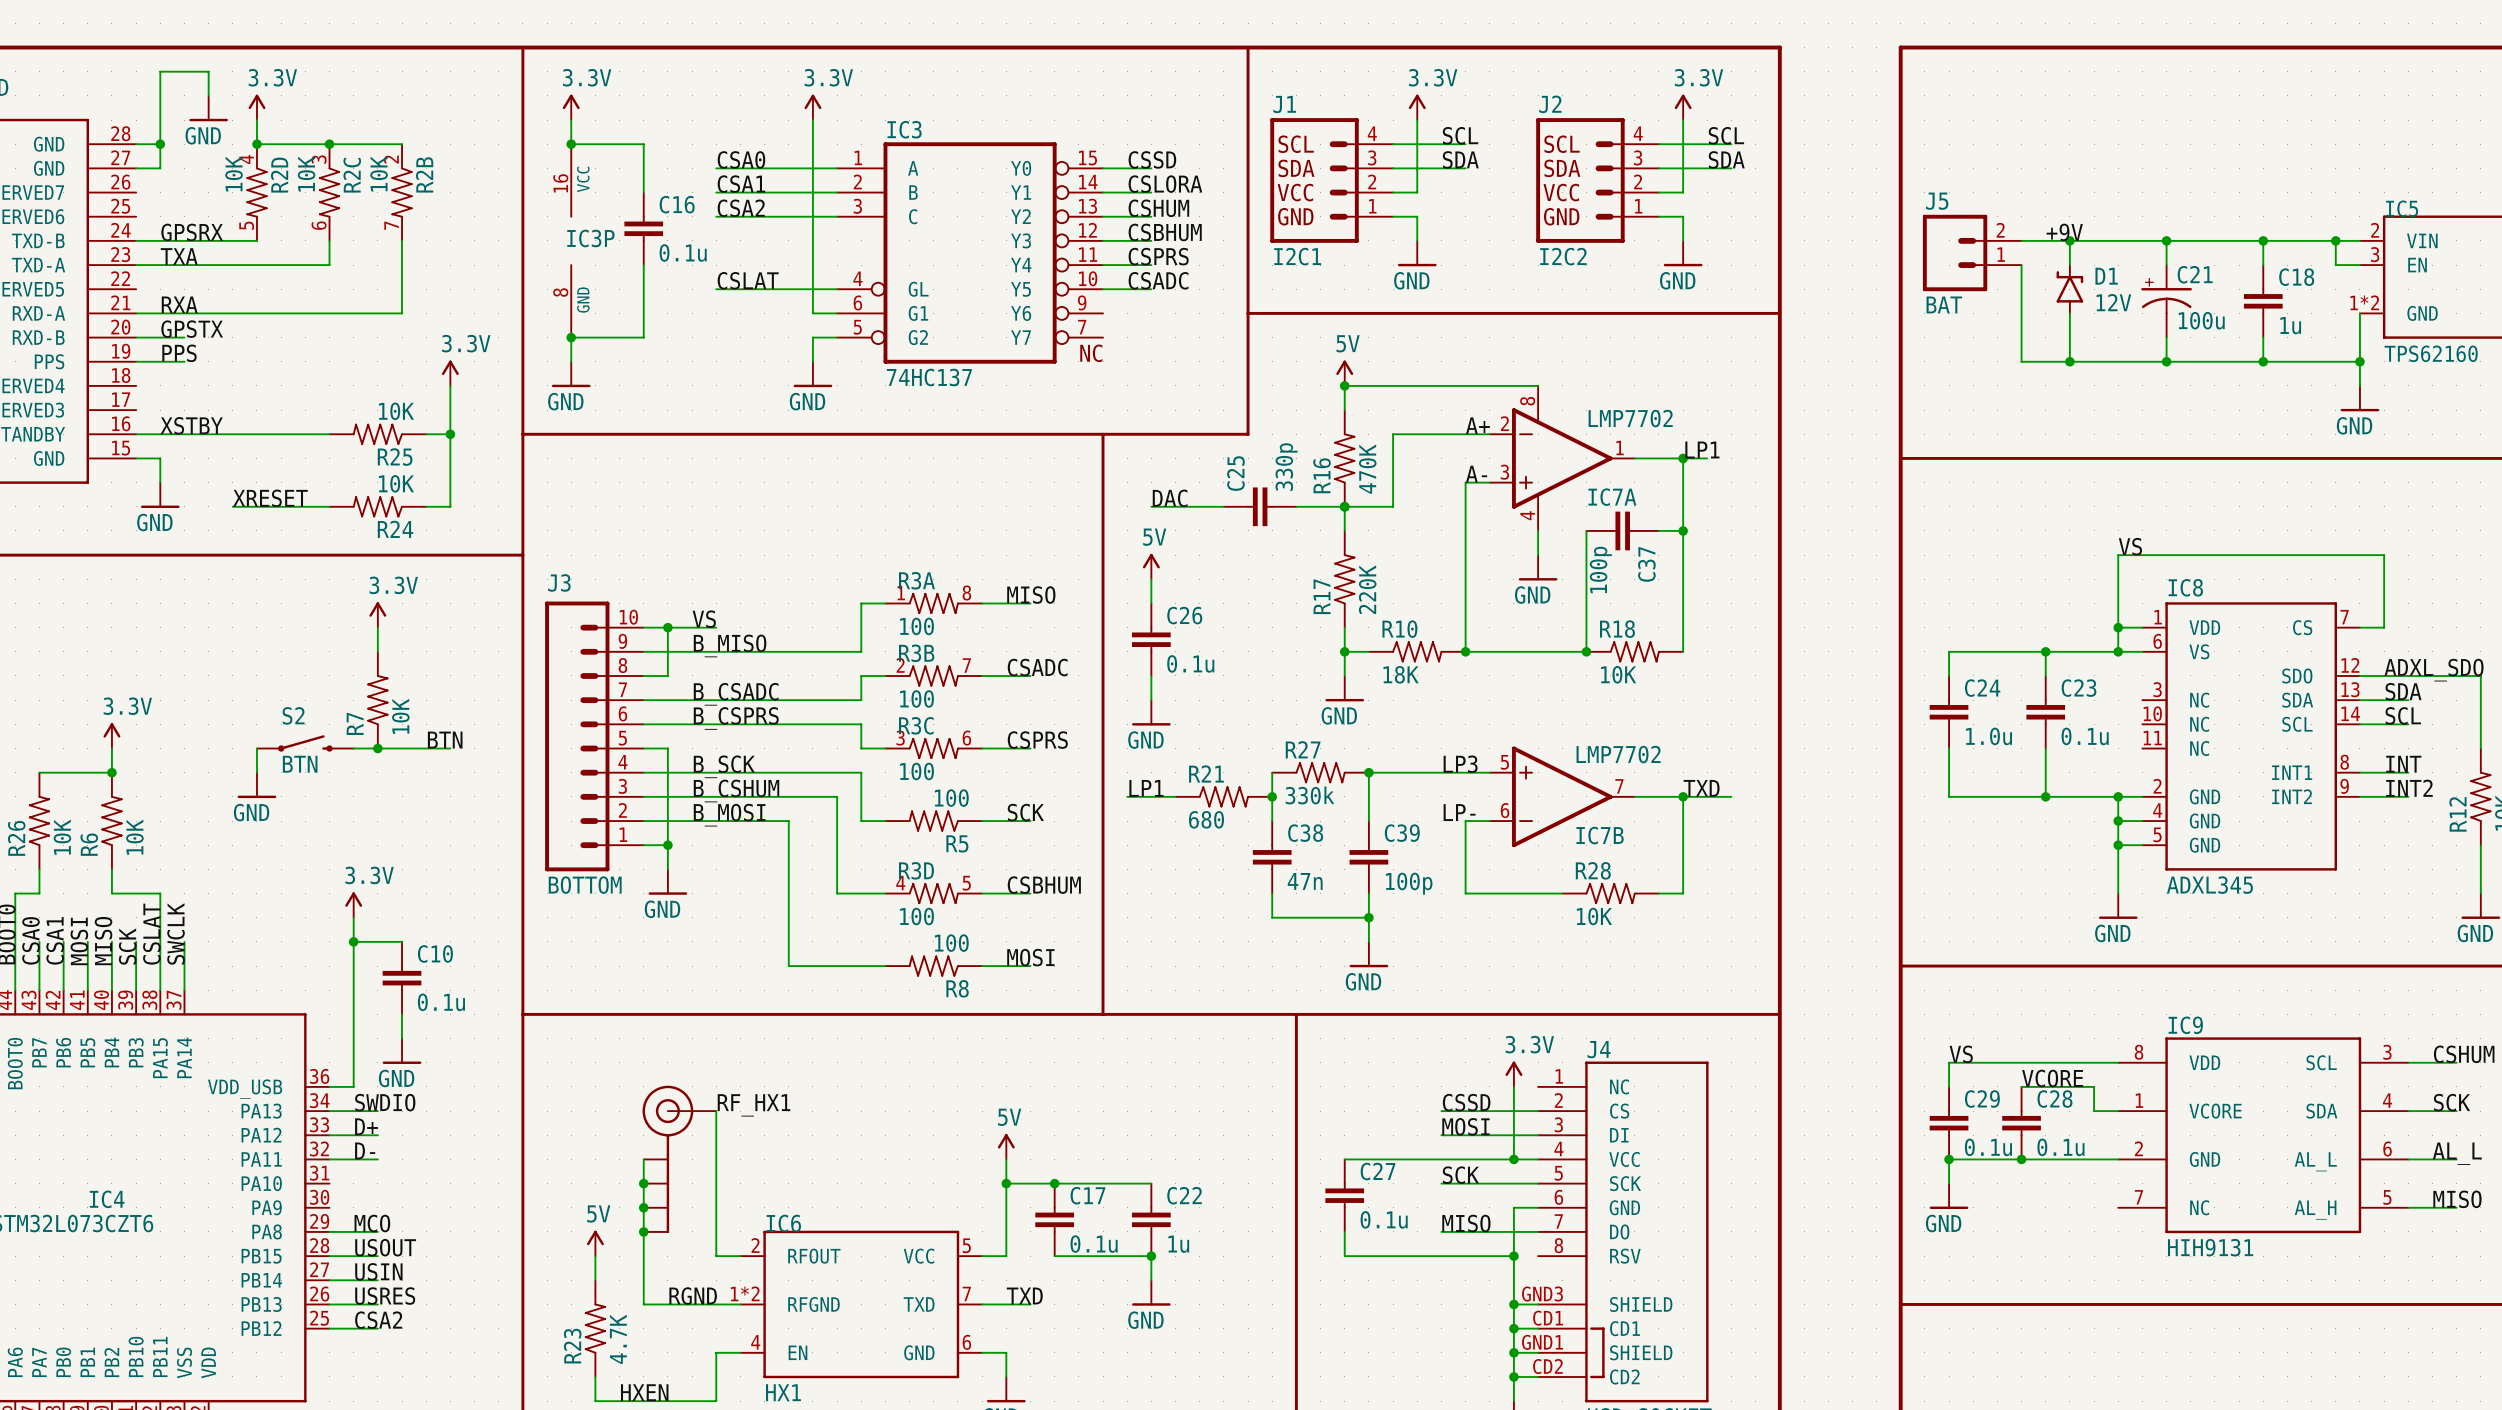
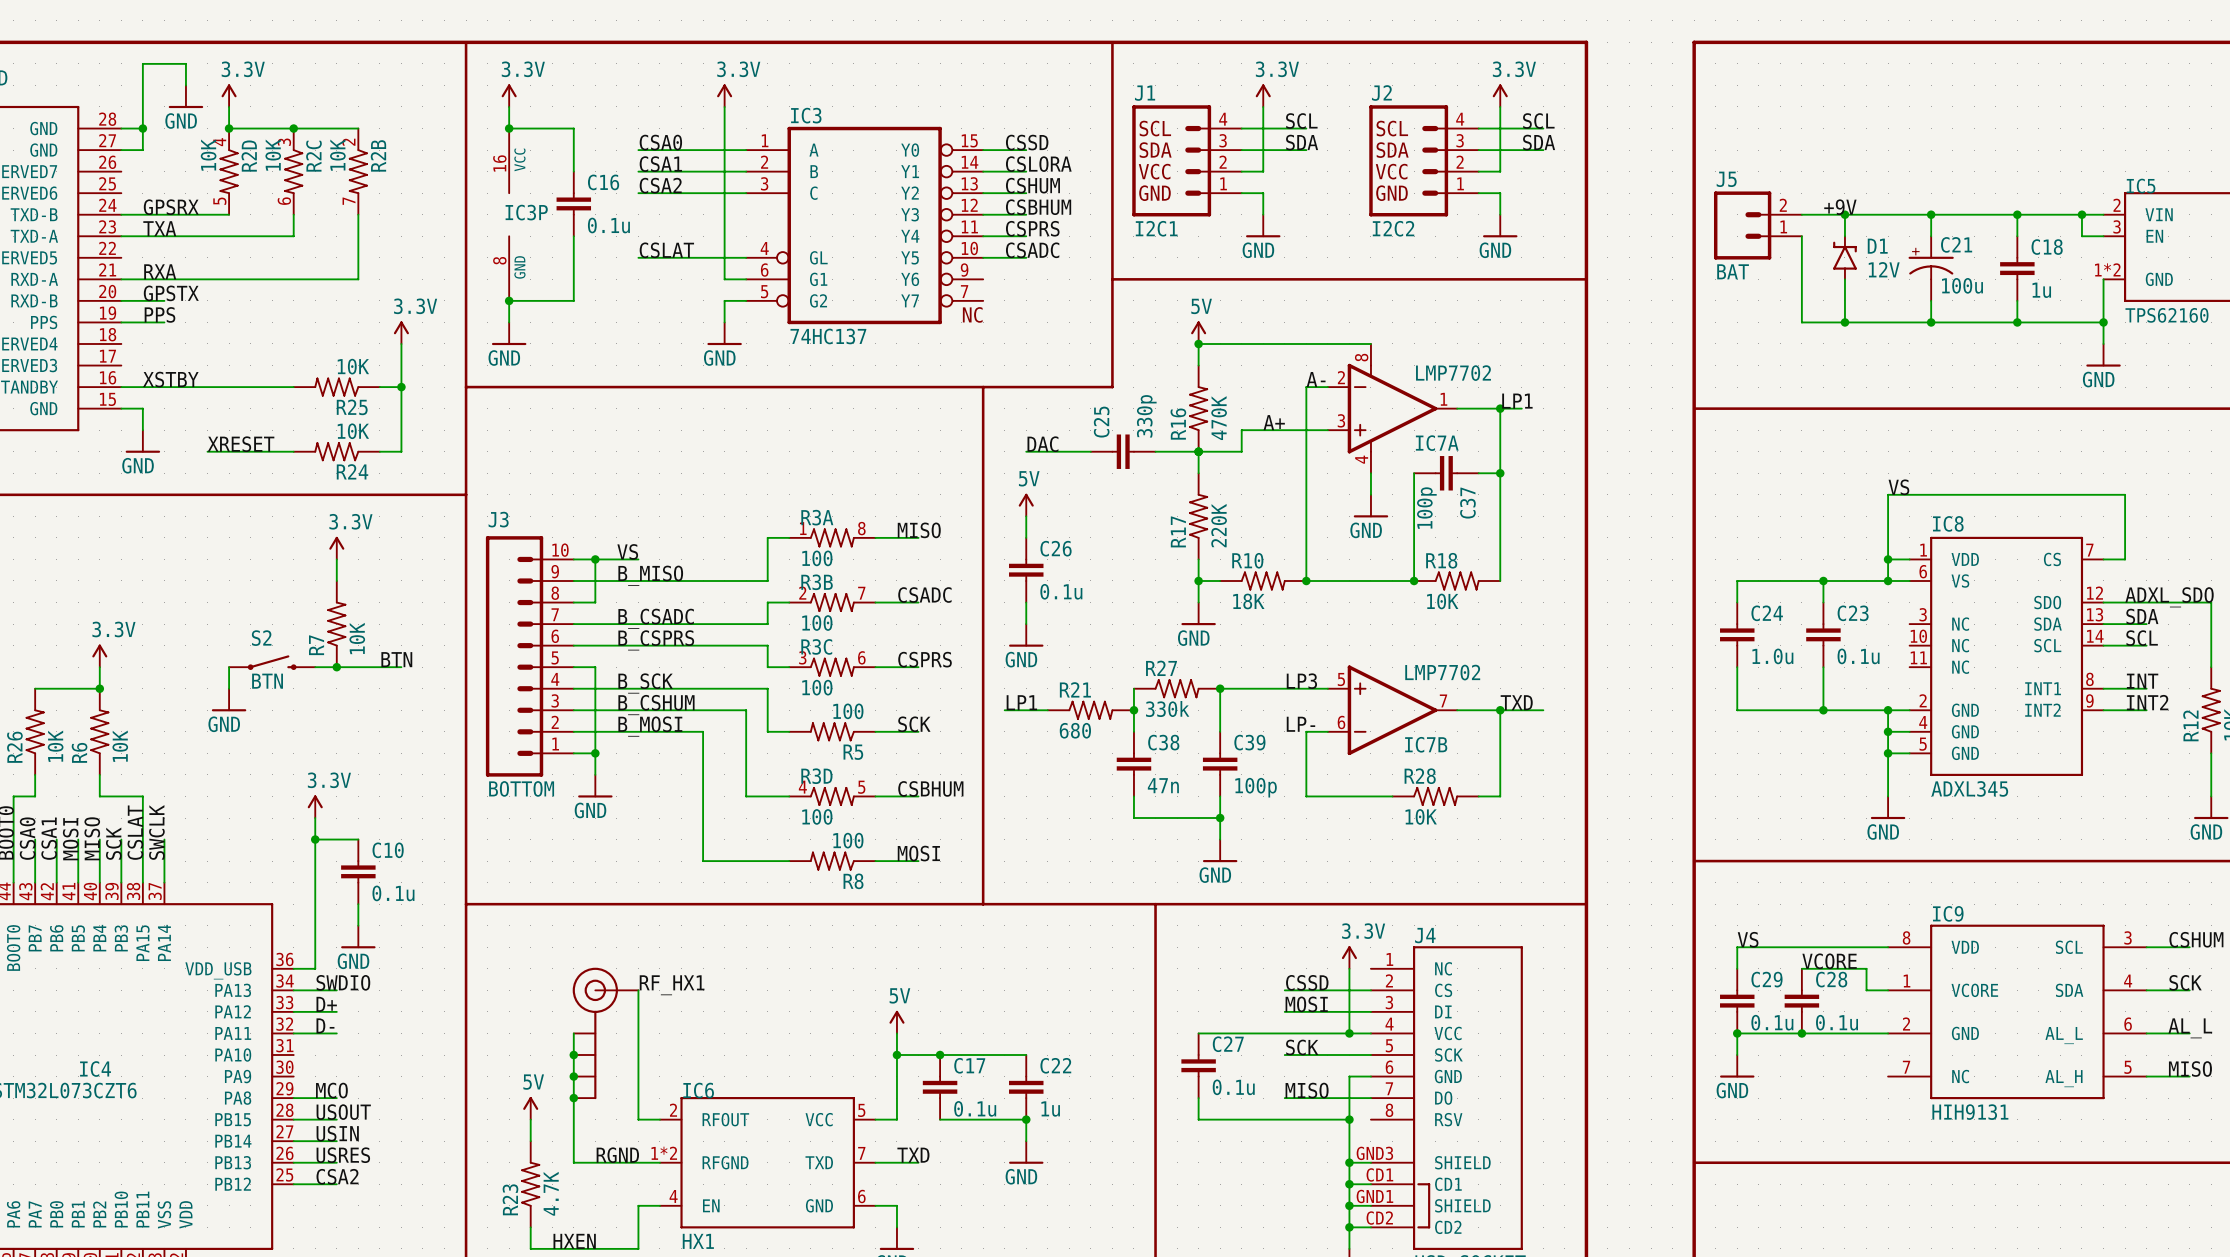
label: A+ (1477, 425) -> A- (1316, 379)
wire: (1465, 434) (1393, 434) (1393, 482) -> (1306, 387) (1306, 430) (1241, 430)
label: none -> A+ (1274, 422)
label: A- (1476, 474) -> none

